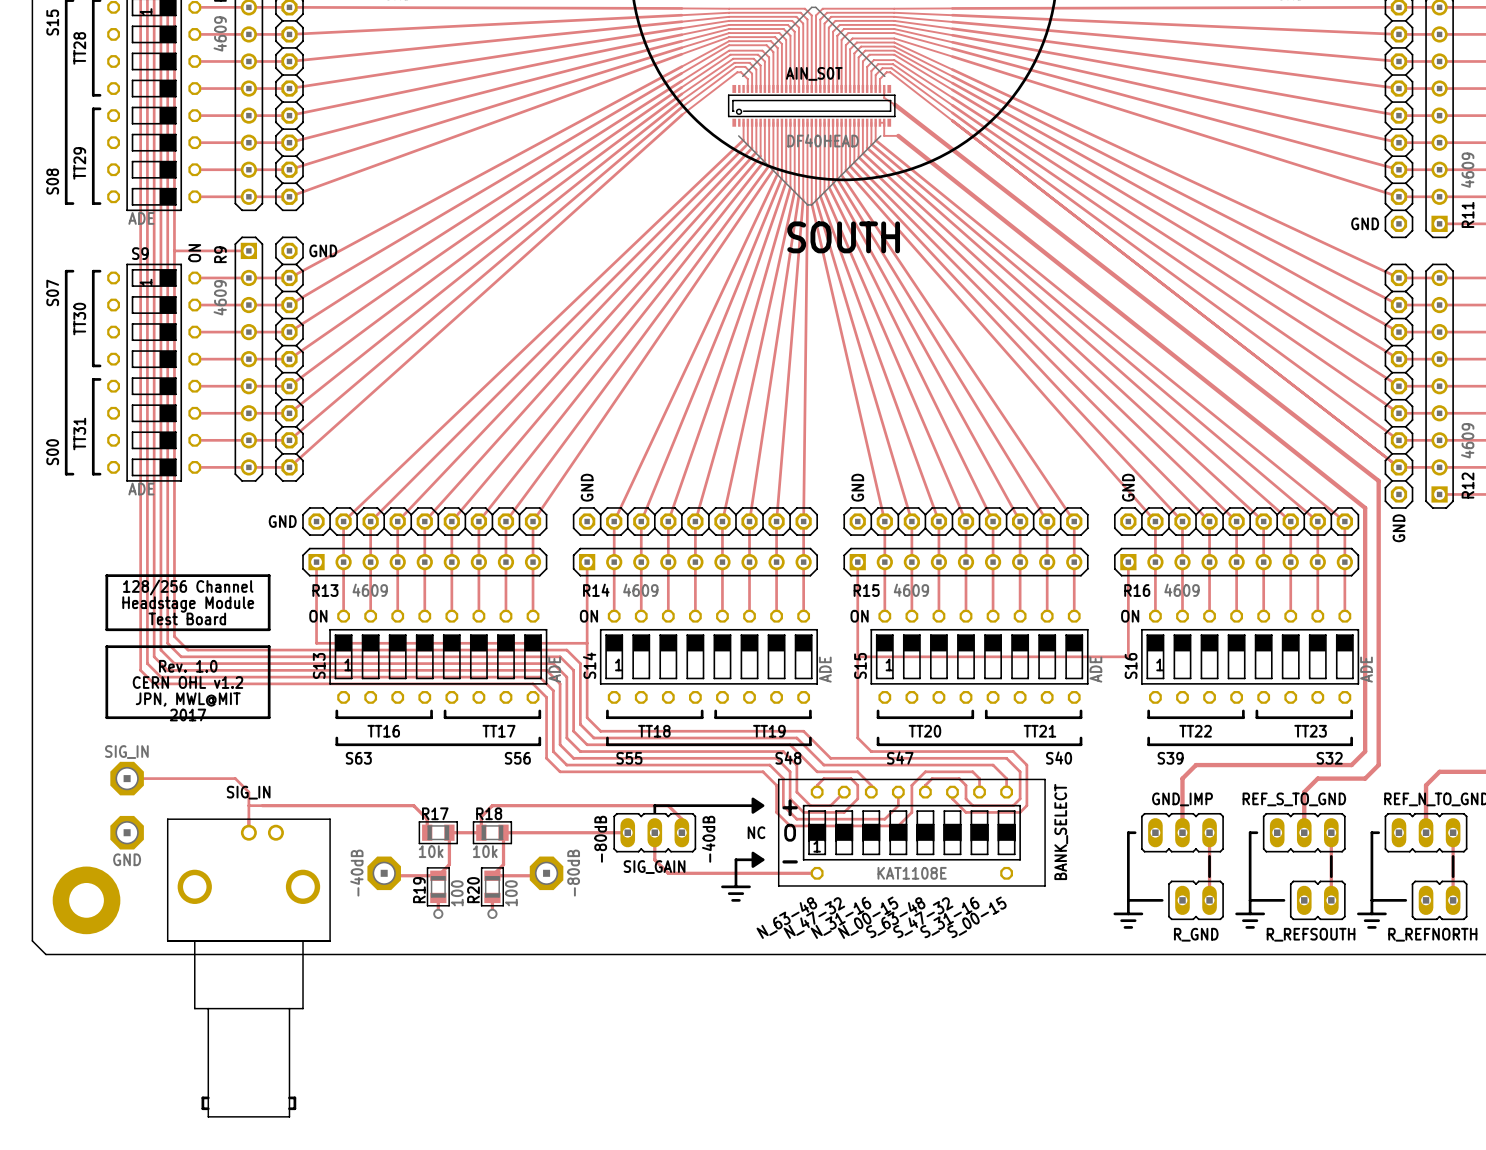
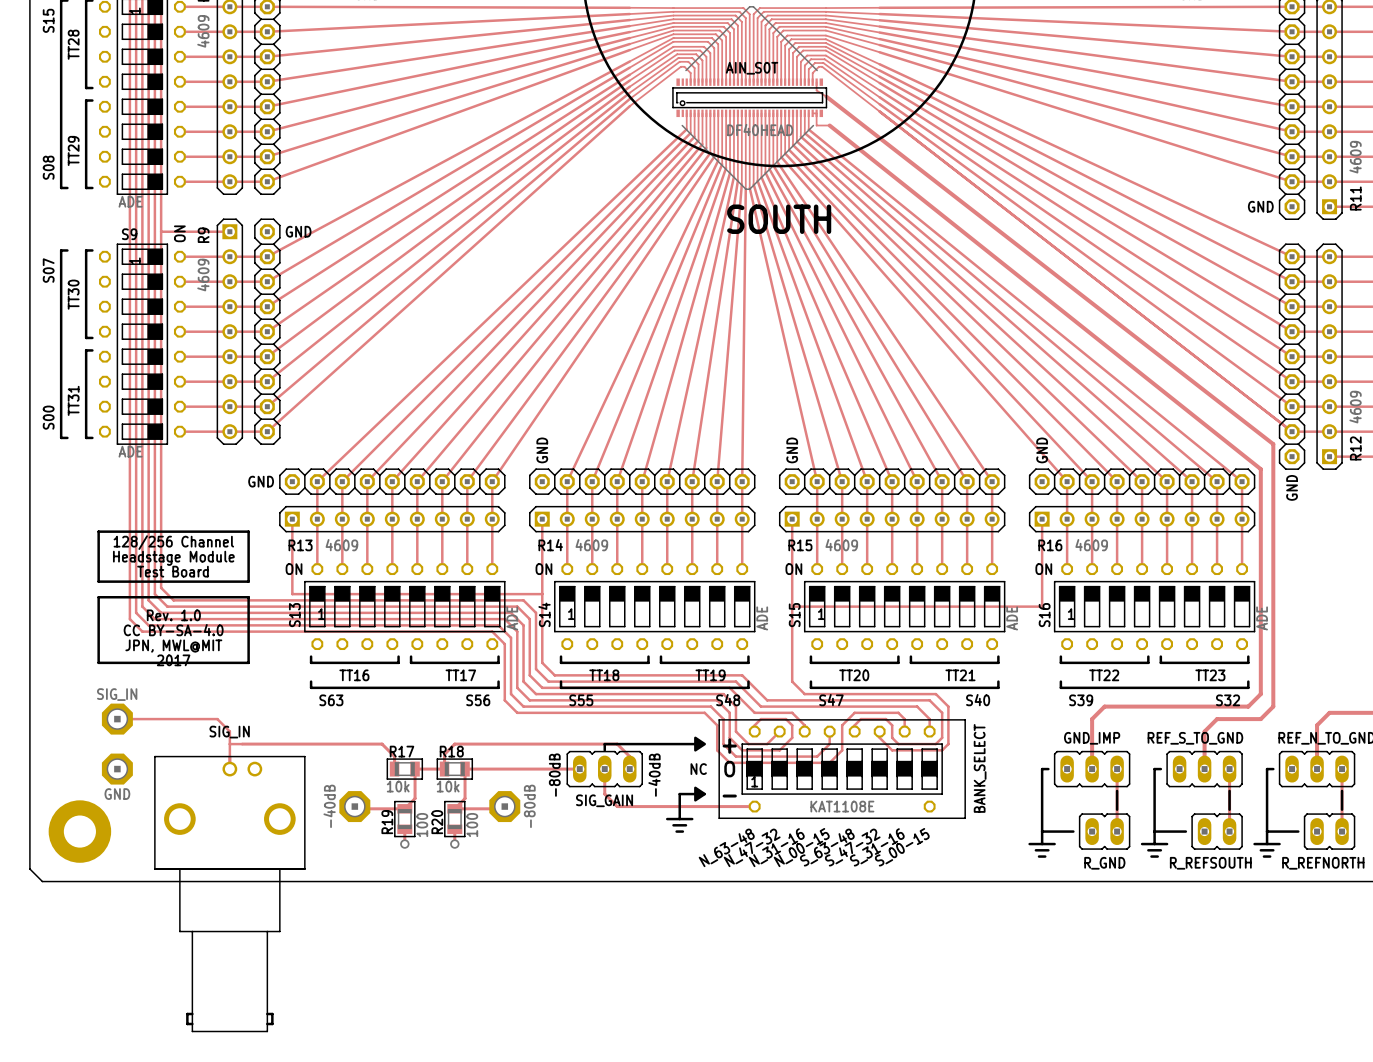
text: CERN OHL v1.2 (188, 682) -> CC BY-SA-4.0 (173, 630)

